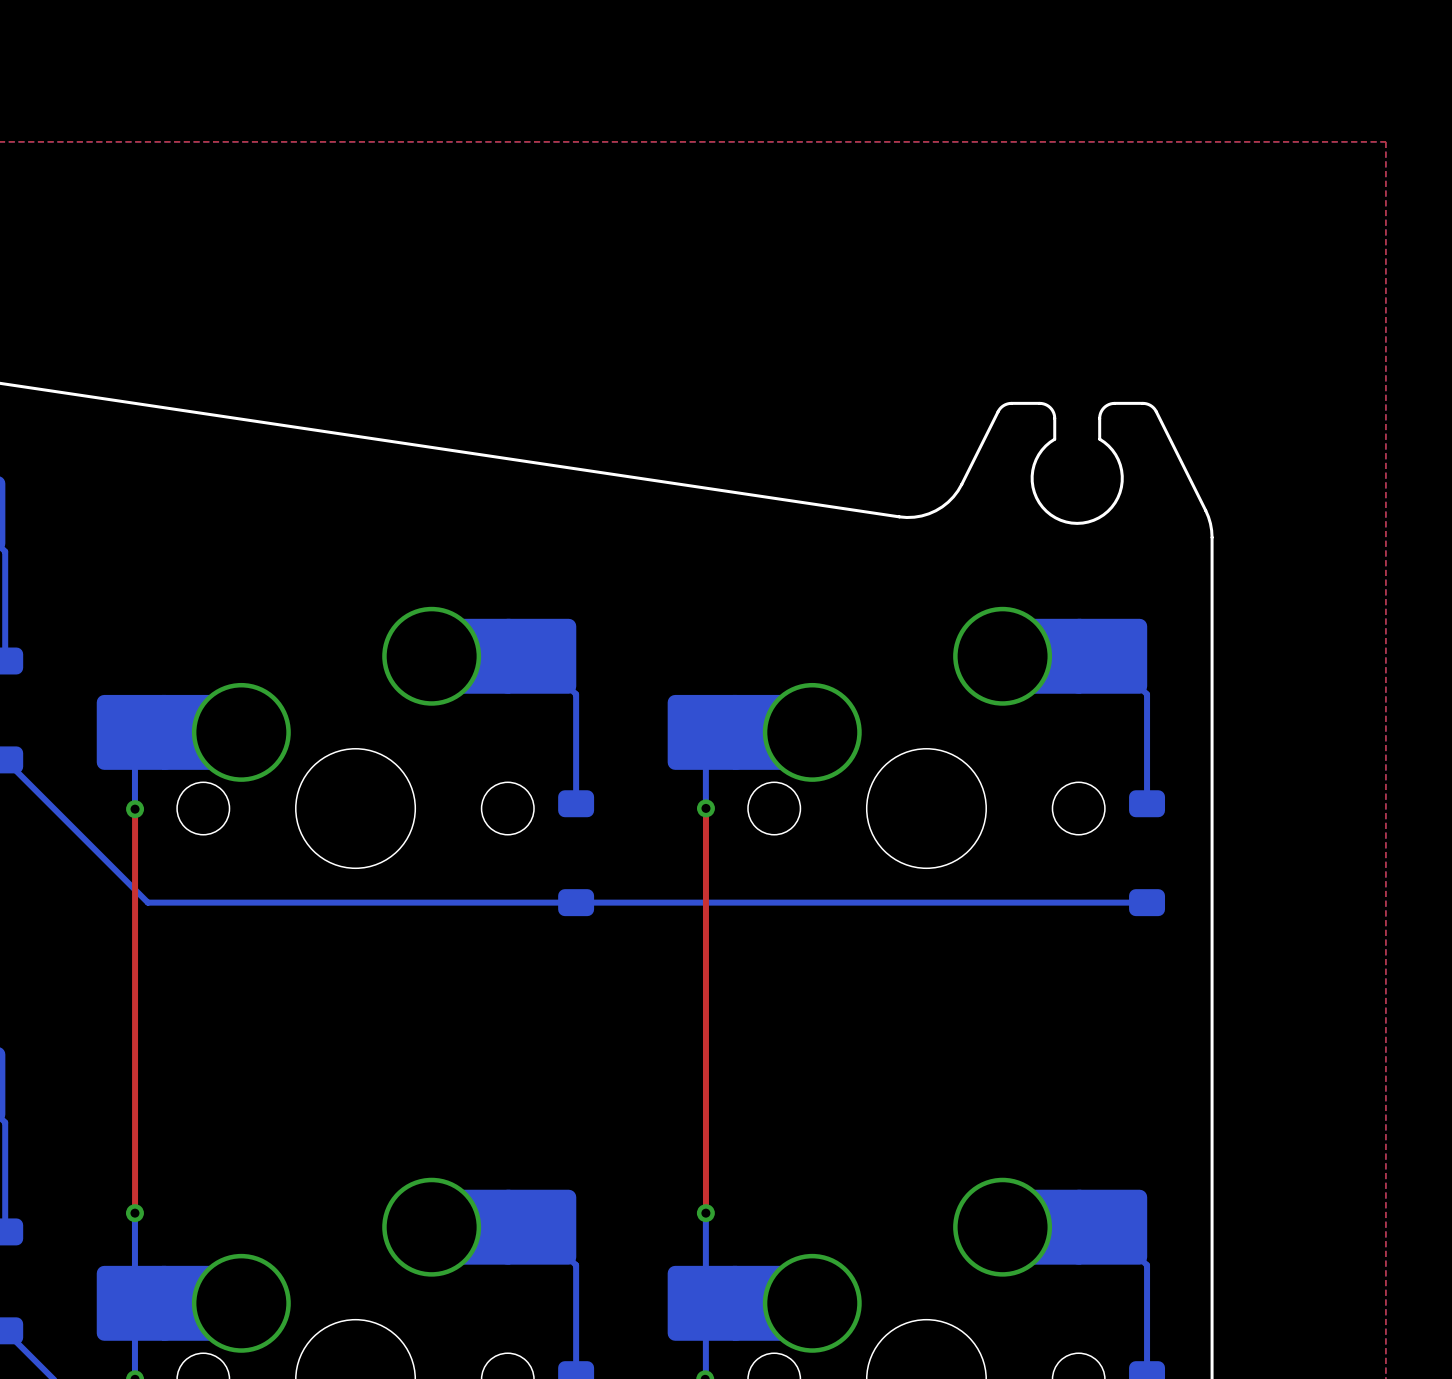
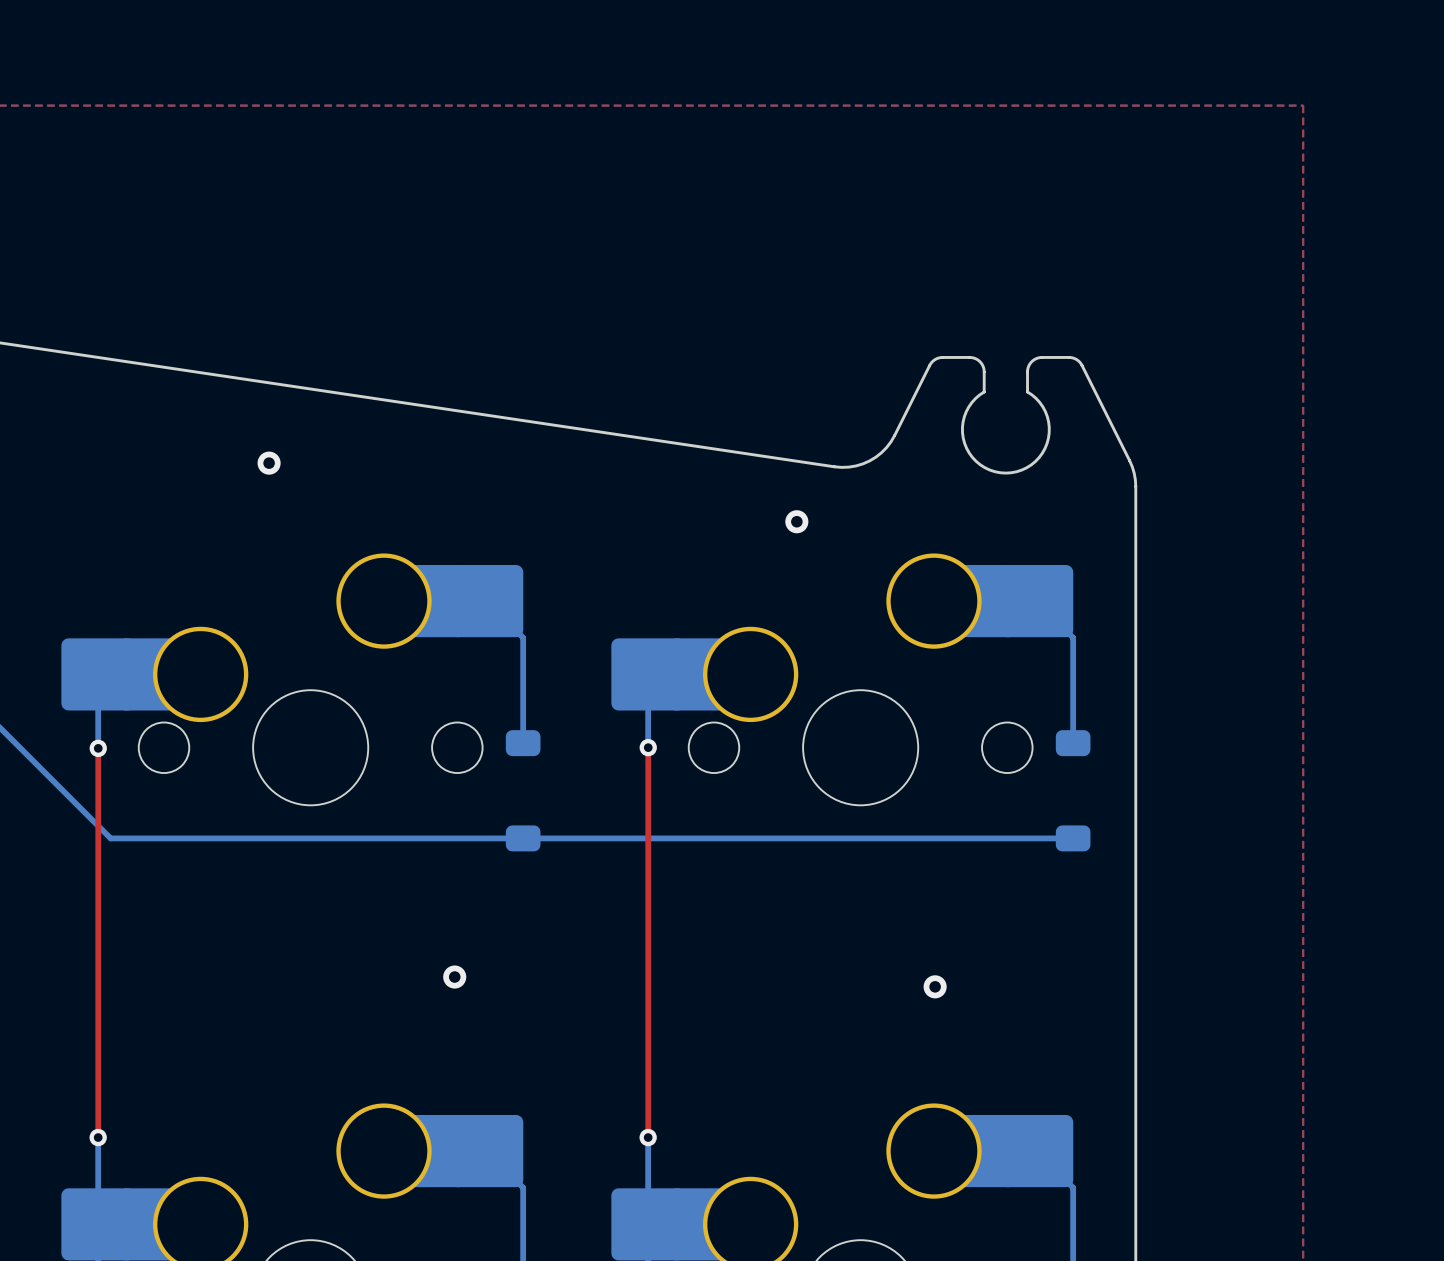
via: none -> (269, 463)
via: none -> (796, 521)
via: none -> (454, 977)
via: none -> (935, 986)

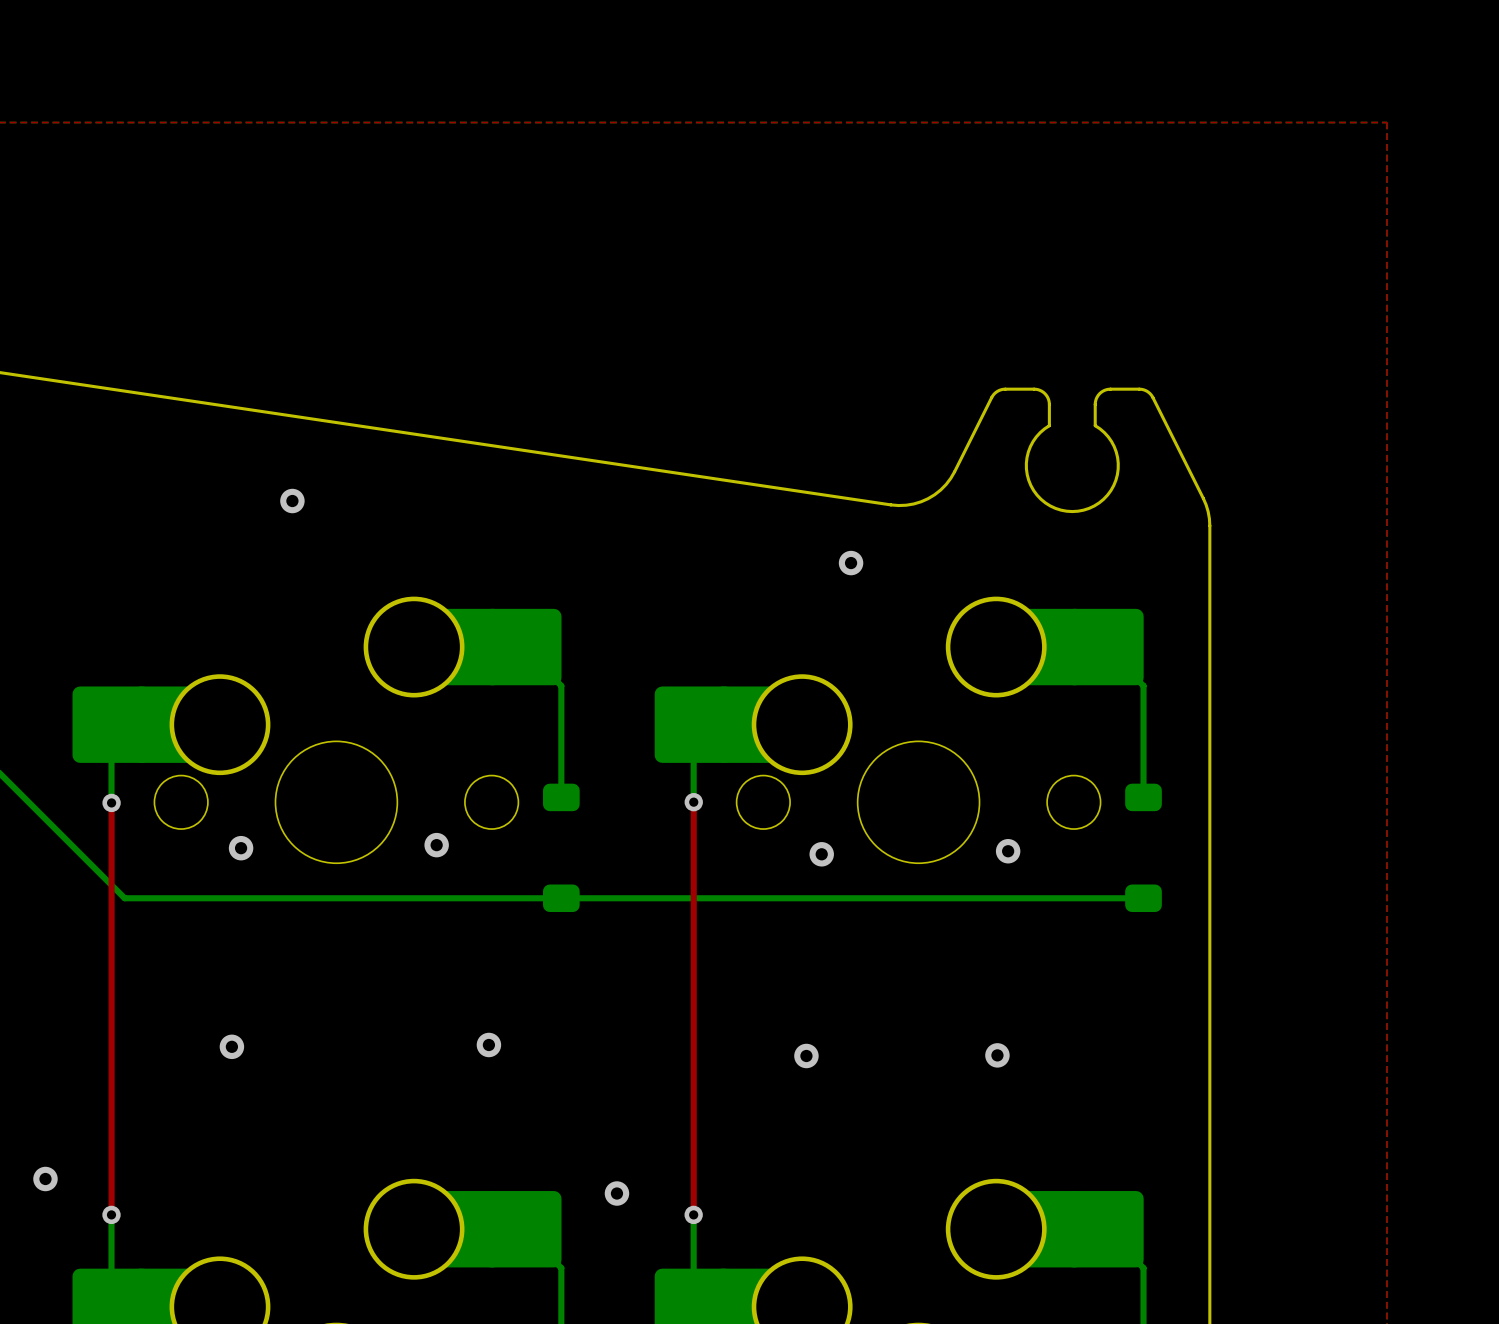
via: none -> (436, 845)
via: none -> (241, 848)
via: none -> (1008, 851)
via: none -> (821, 854)
via: none -> (231, 1046)
via: none -> (806, 1055)
via: none -> (45, 1178)
via: none -> (616, 1193)

